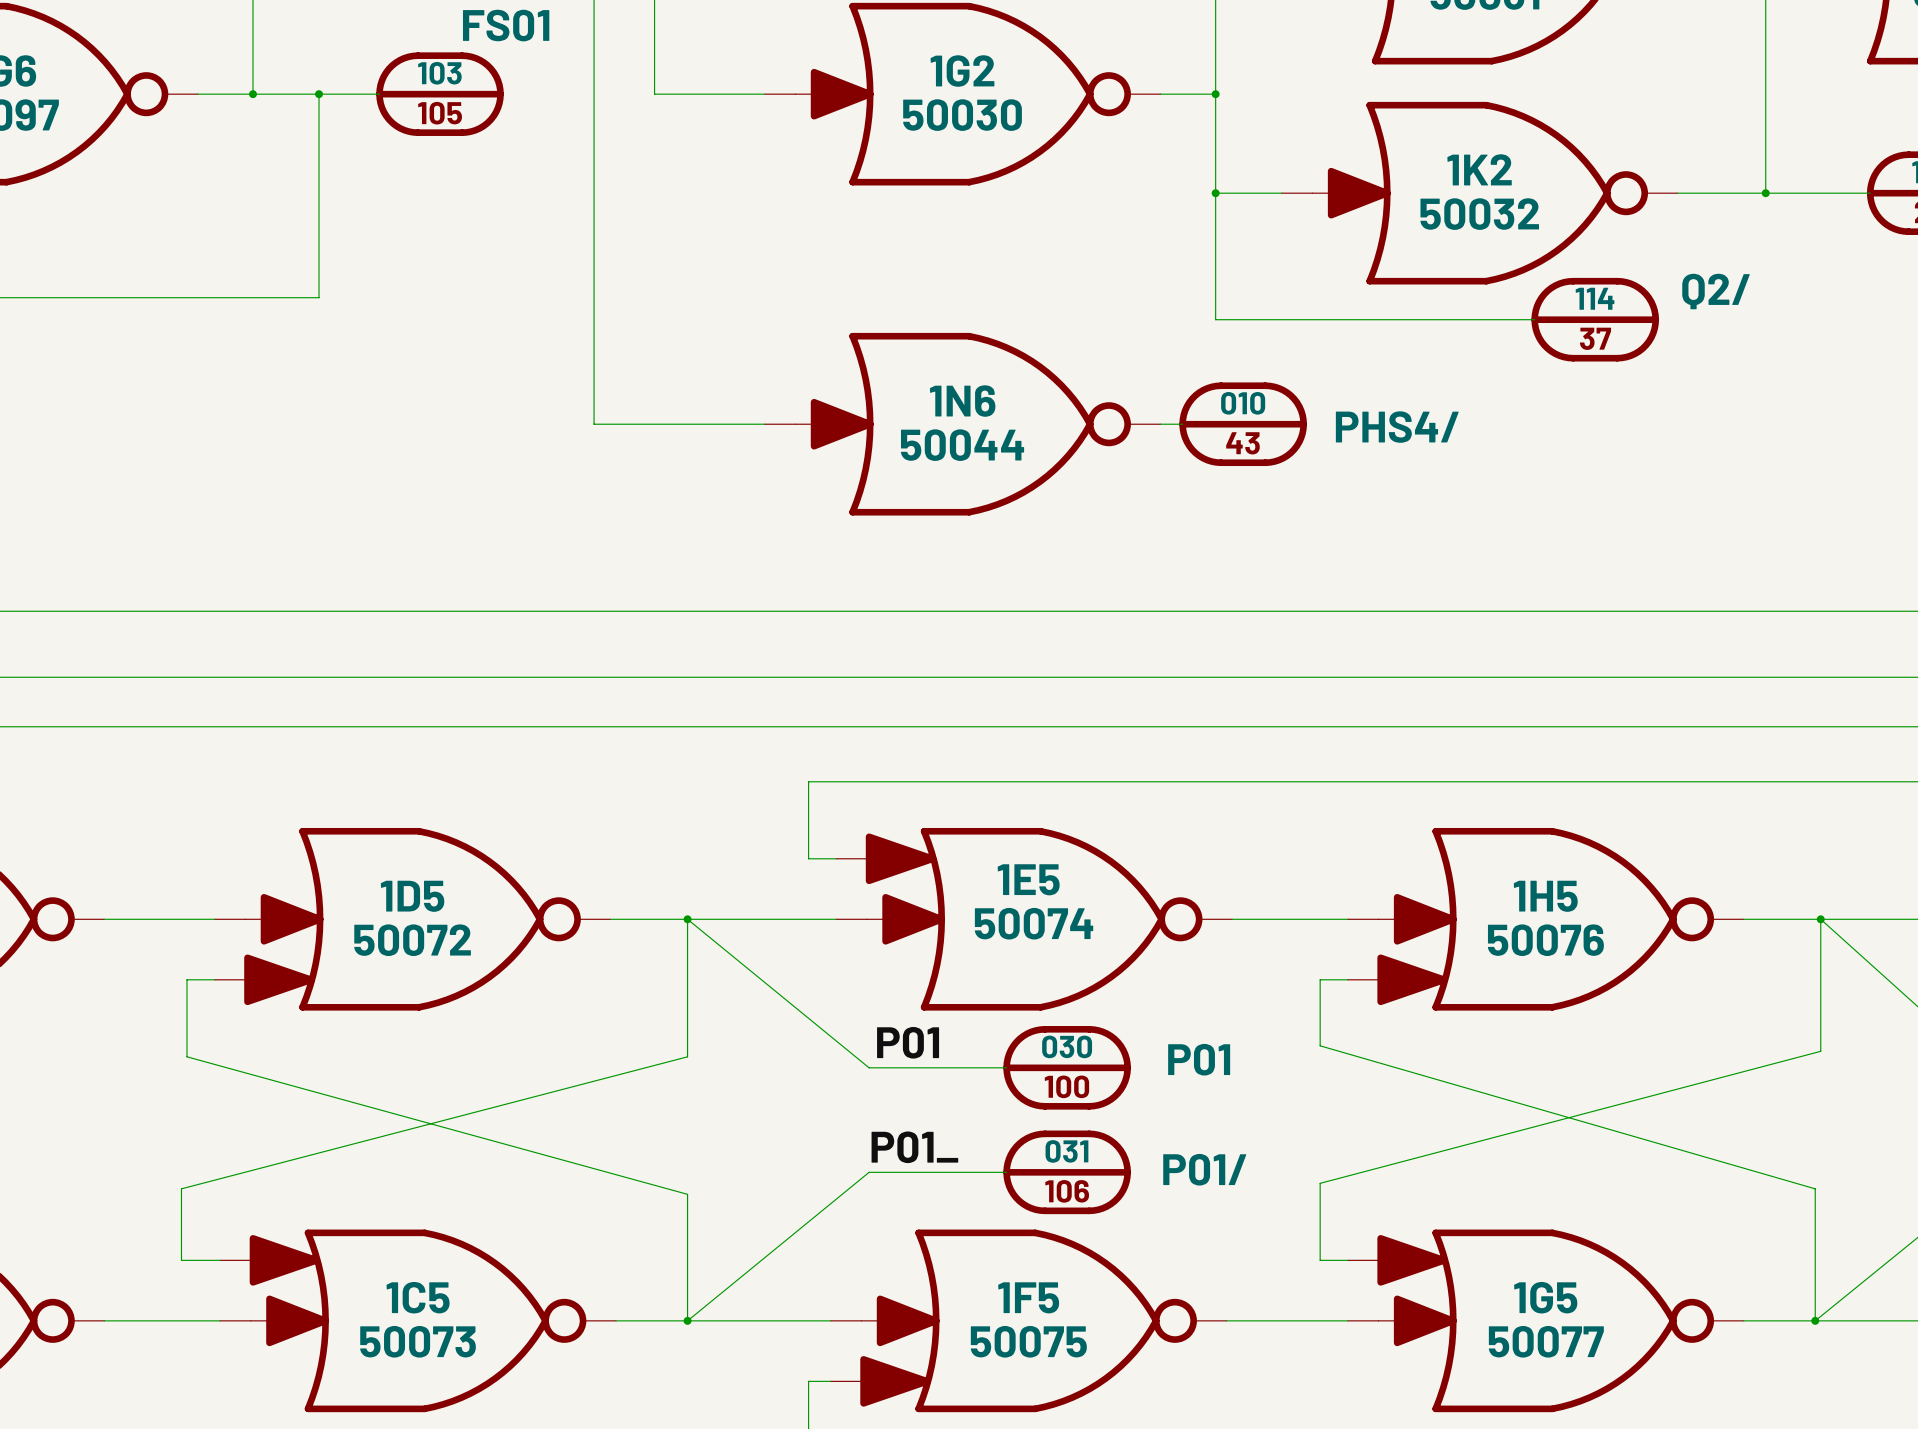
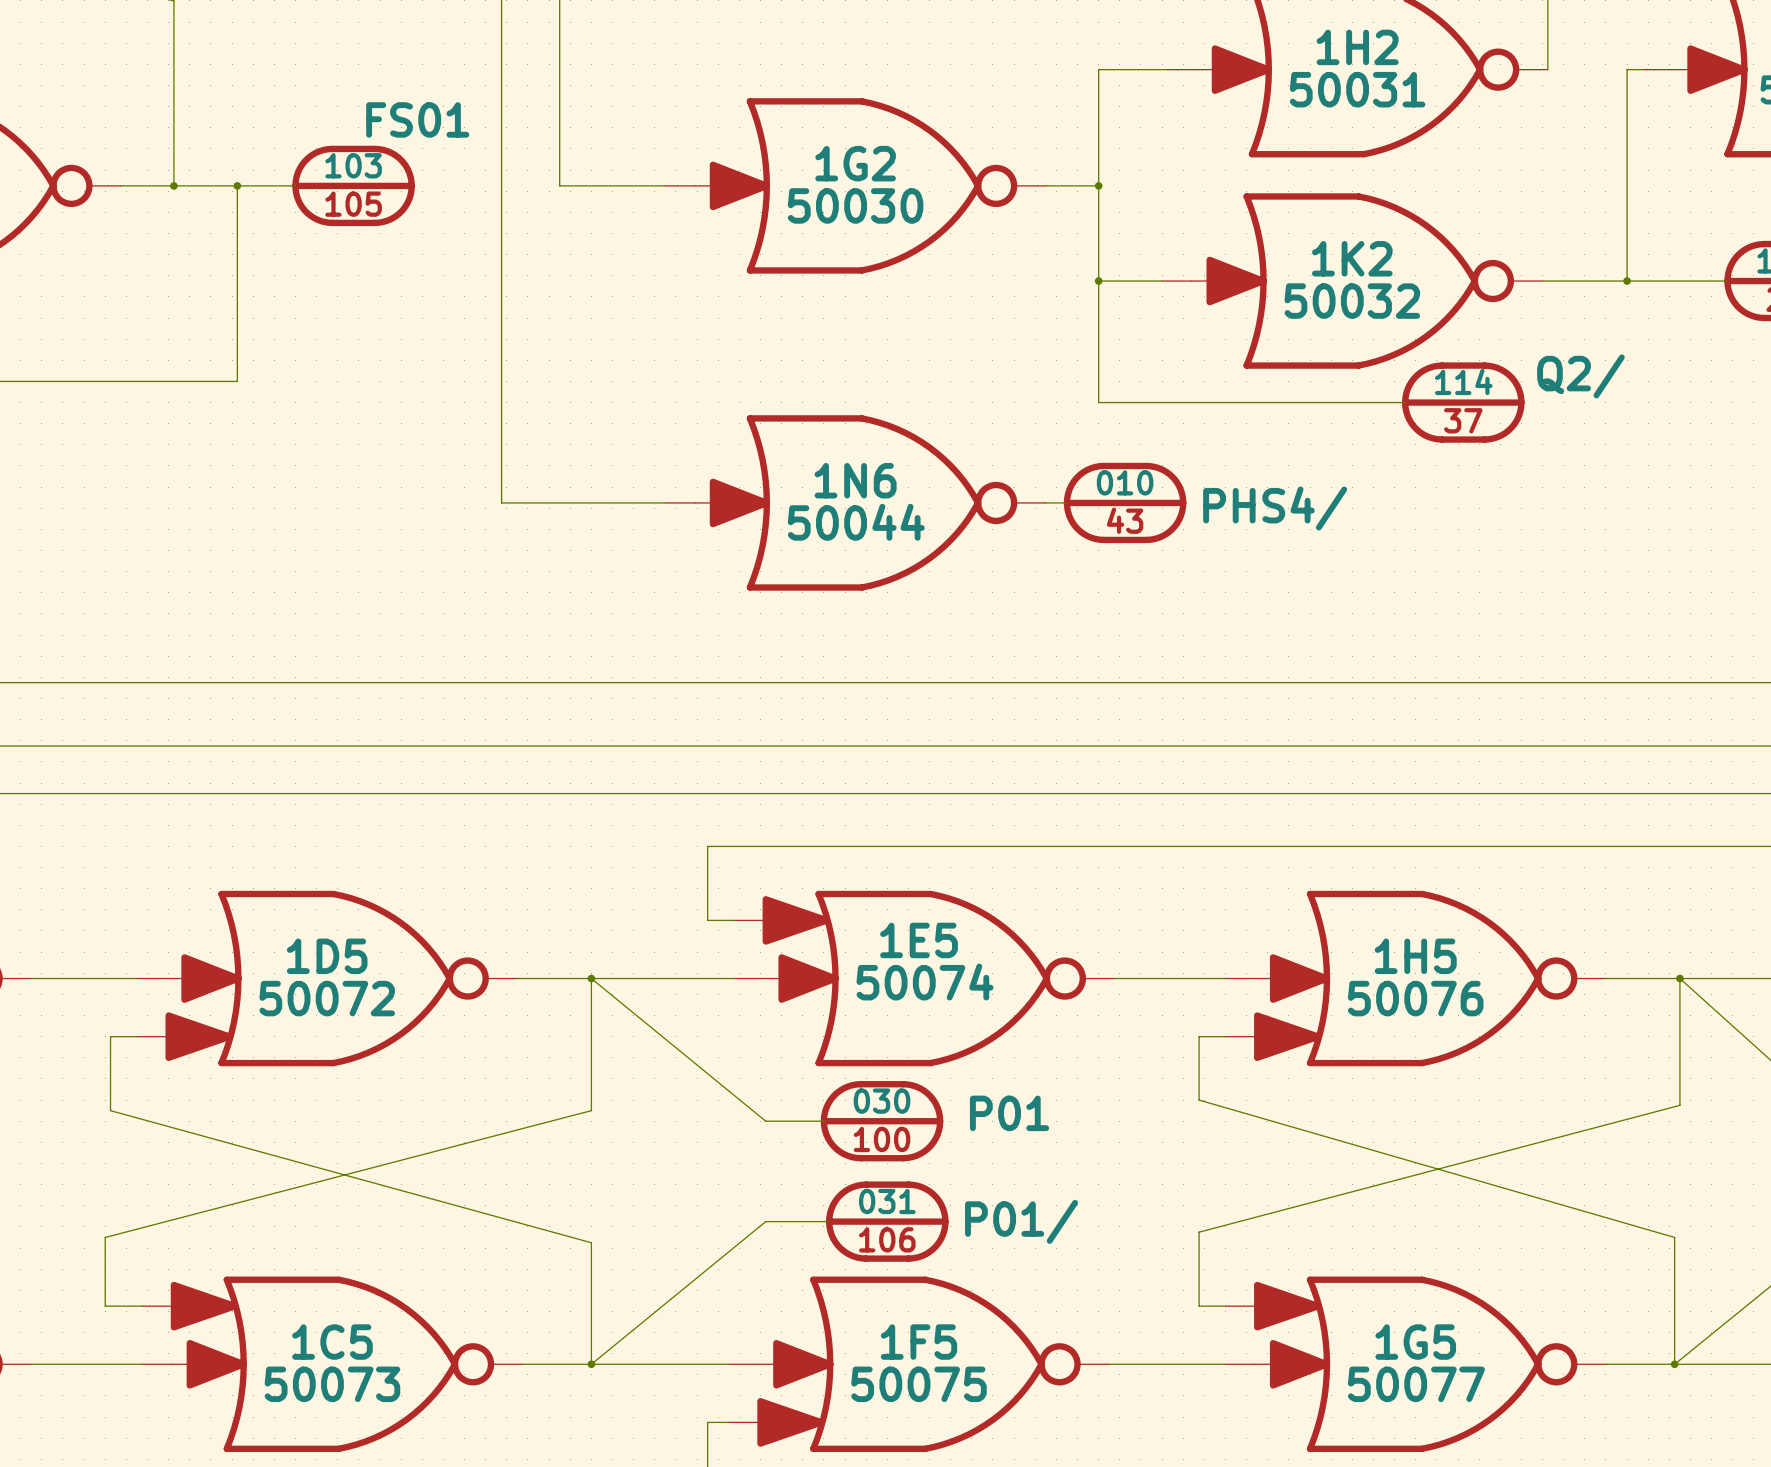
label: P01 (908, 1042) -> none
part position: (1067, 1067) -> (882, 1121)
label: P01_ (914, 1147) -> none
part position: (1067, 1172) -> (887, 1221)

